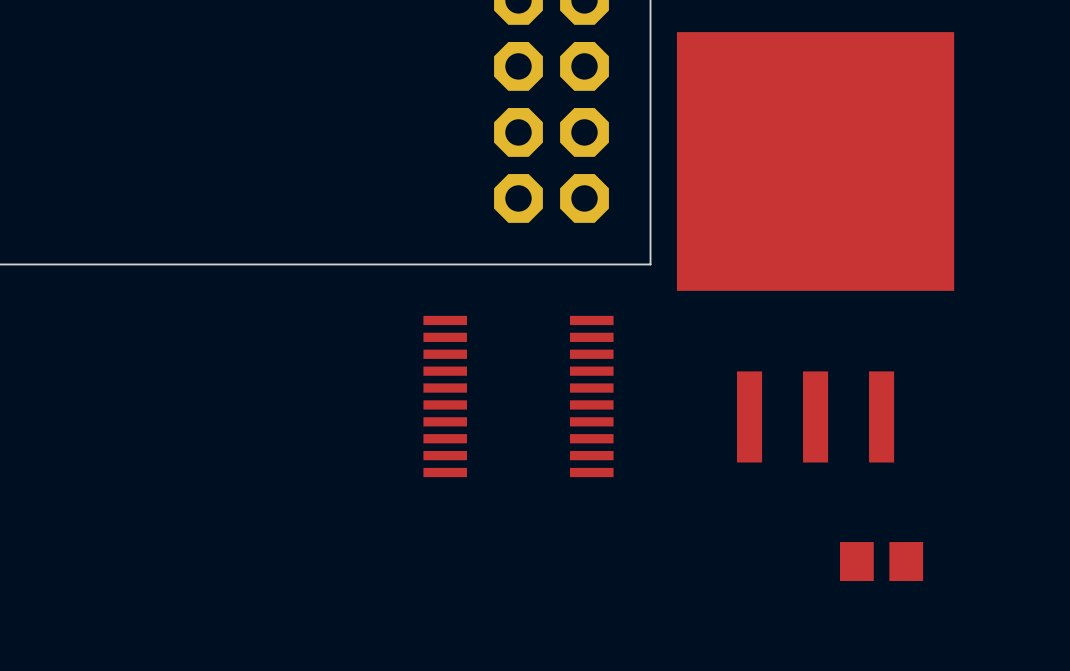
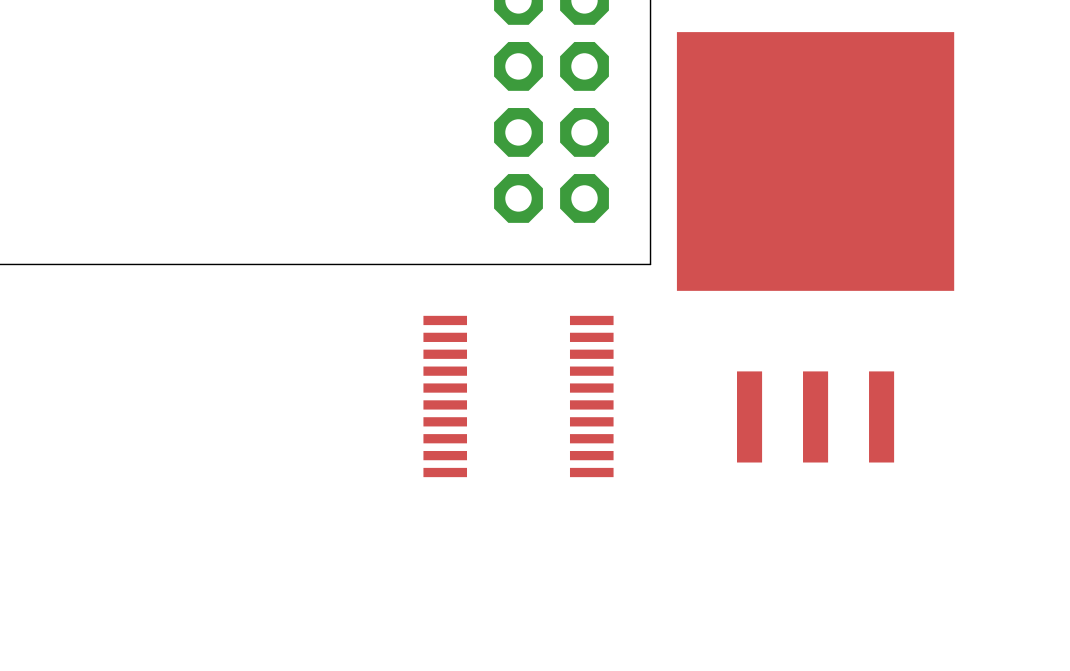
part: (881, 561) -> none

